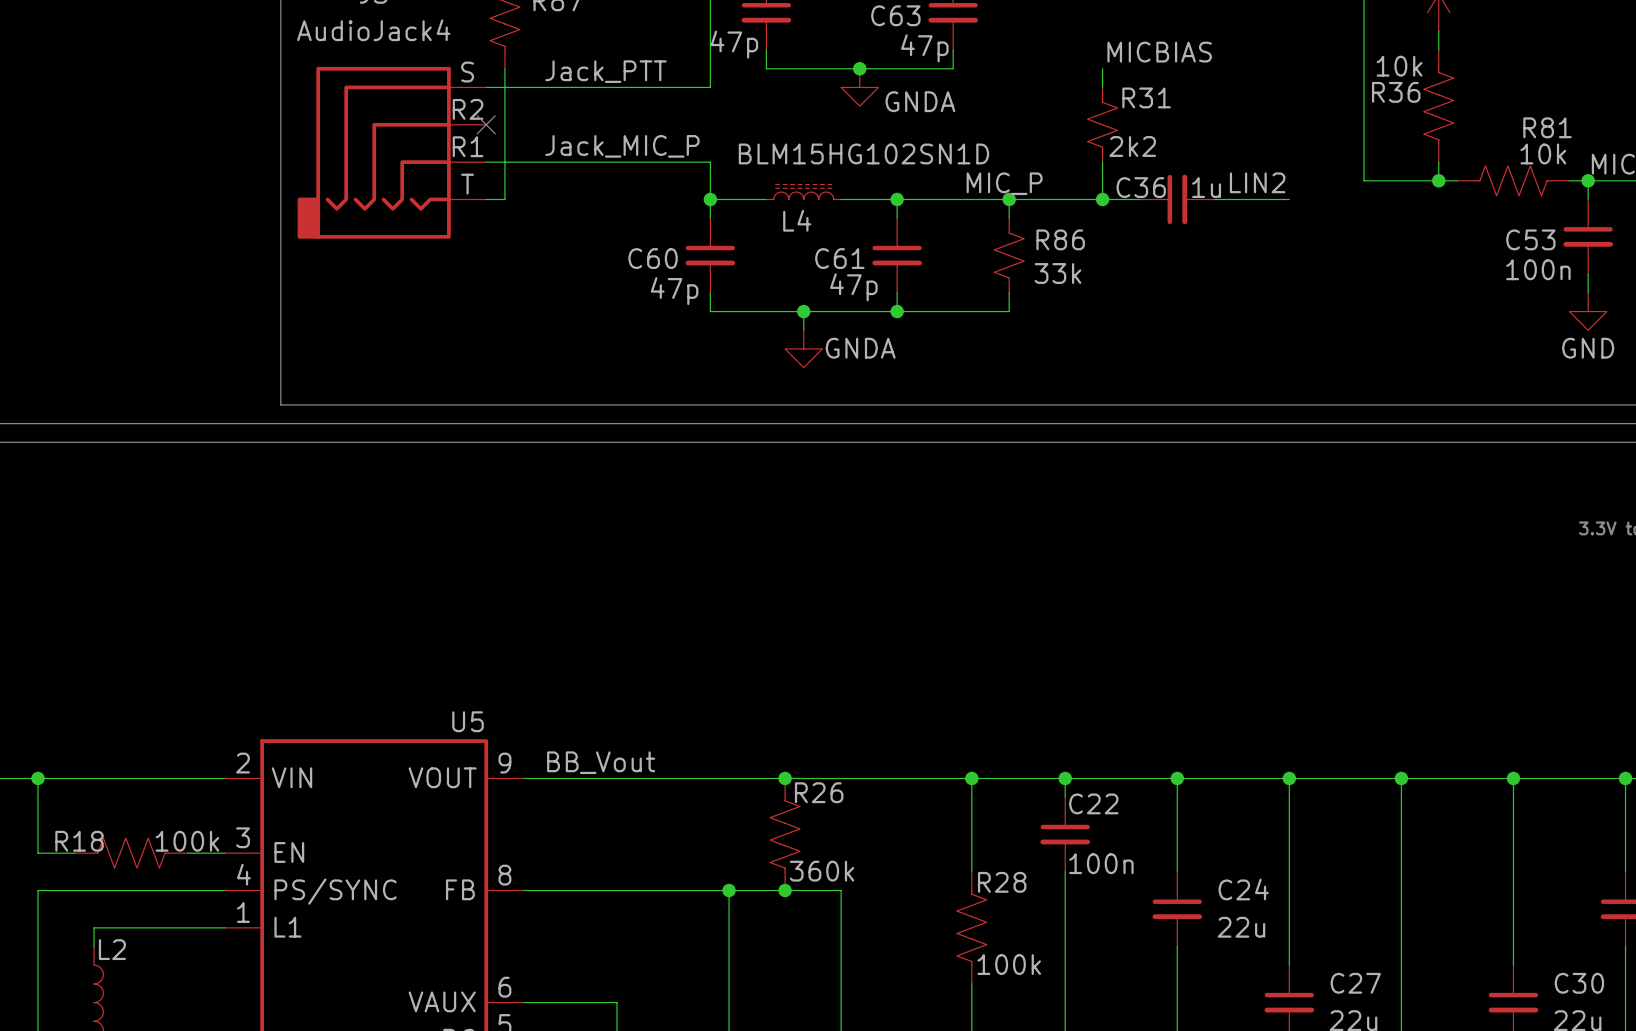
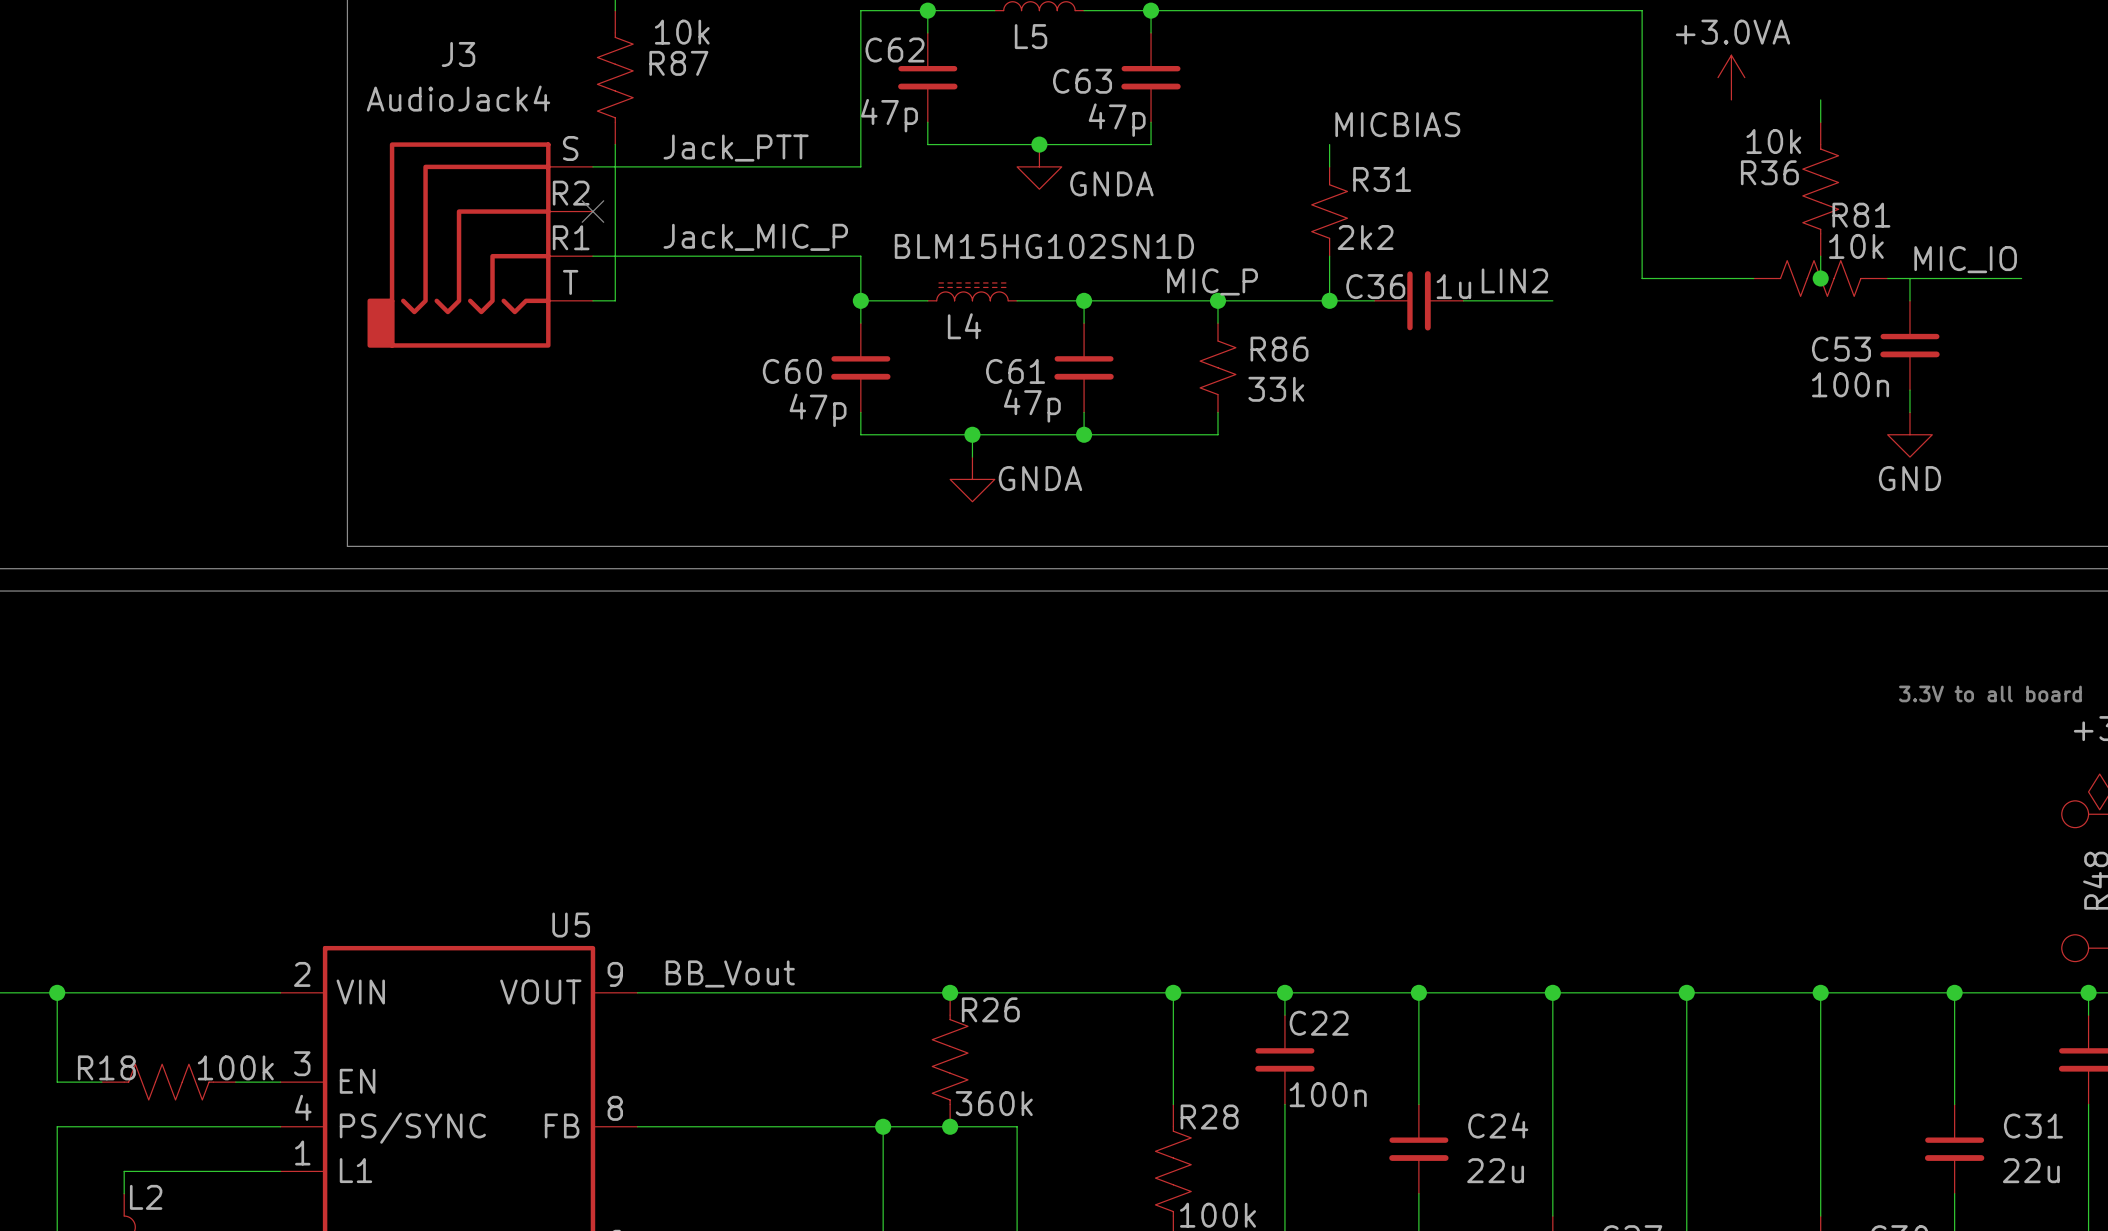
wire: (1438, 31) (1438, 50) -> (1820, 99) (1820, 122)
R36 position: (1438, 106) -> (1820, 189)
wire: (1438, 162) (1438, 180) -> (1820, 256) (1820, 278)
junction: (1438, 180) -> none
junction: none -> (1820, 278)
junction: (1588, 180) -> none

